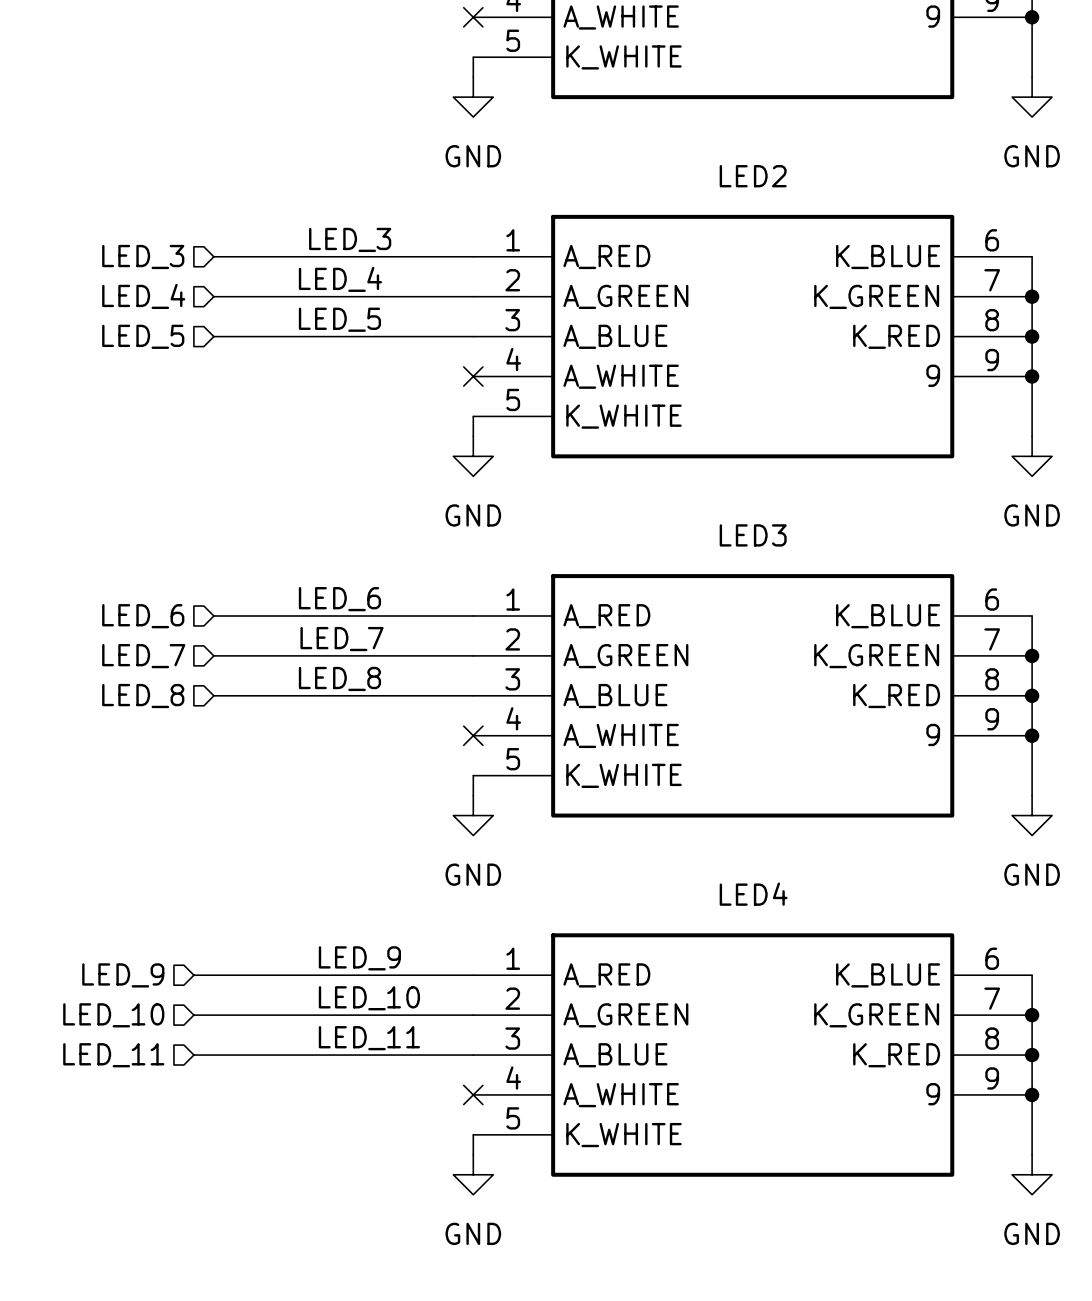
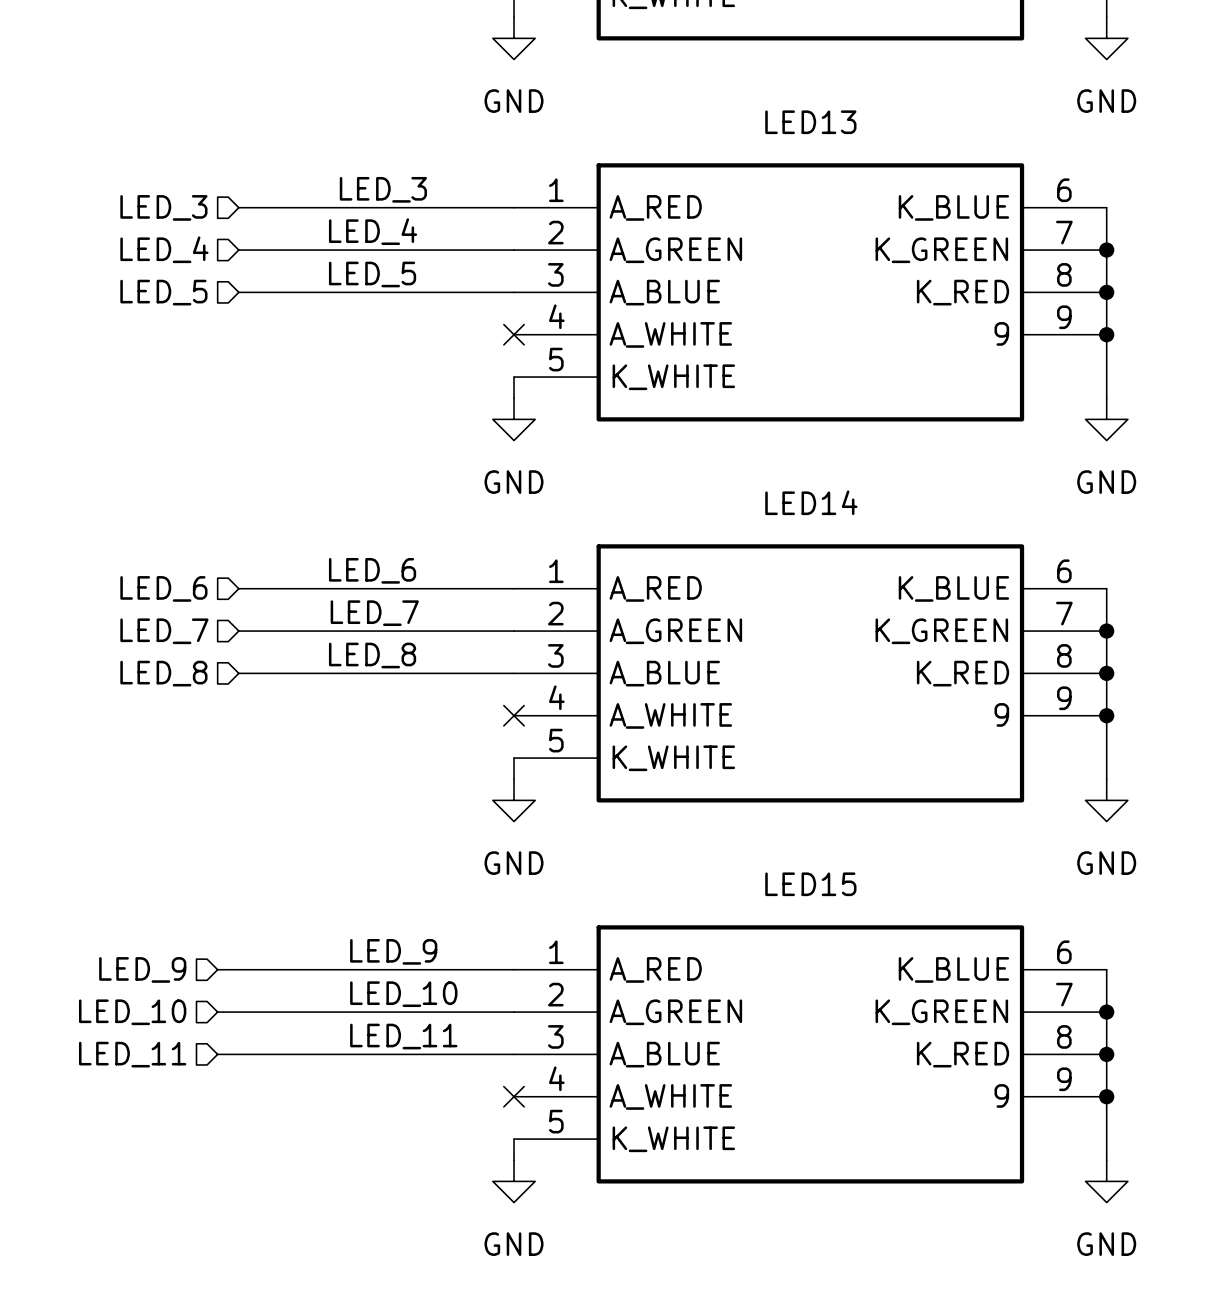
LED2 name: LED2 (753, 176) -> LED13 (810, 122)
LED3 name: LED3 (753, 535) -> LED14 (811, 502)
LED4 name: LED4 (753, 894) -> LED15 (810, 884)

